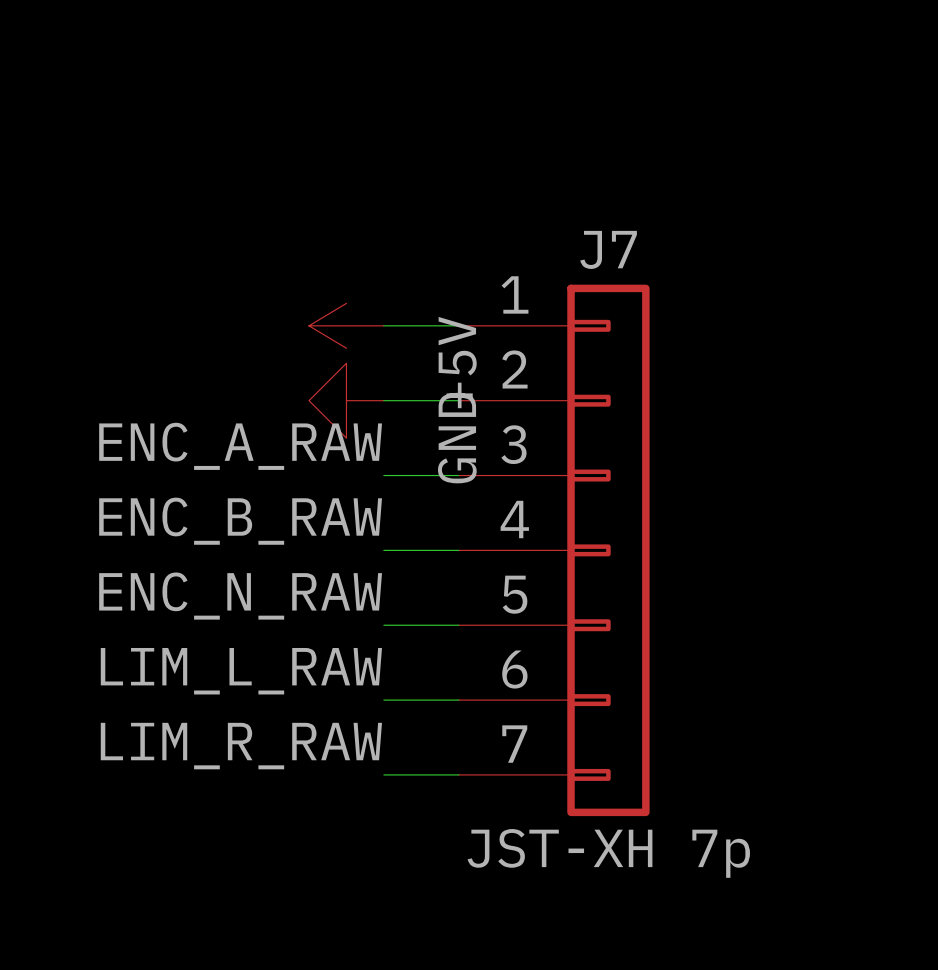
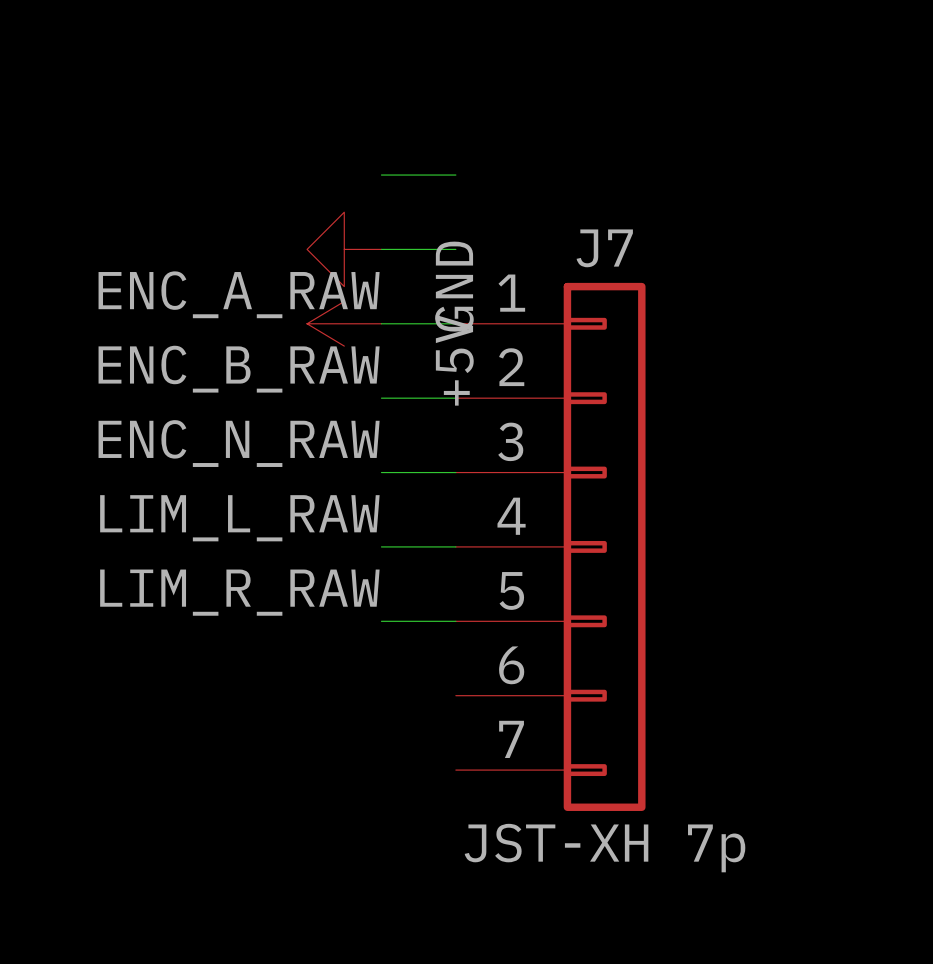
label: none -> ENC_A_RAW (239, 294)
label: none -> ENC_B_RAW (239, 369)
power symbol position: GND (346, 400) -> GND (344, 249)
label: ENC_A_RAW (240, 446) -> ENC_N_RAW (239, 443)
label: ENC_B_RAW (240, 521) -> LIM_L_RAW (239, 518)
label: ENC_N_RAW (240, 596) -> LIM_R_RAW (239, 592)
label: LIM_L_RAW (241, 671) -> none
wire: (383, 700) (458, 700) -> (381, 175) (455, 175)
label: LIM_R_RAW (241, 746) -> none
wire: (383, 774) (458, 774) -> (381, 249) (455, 249)

